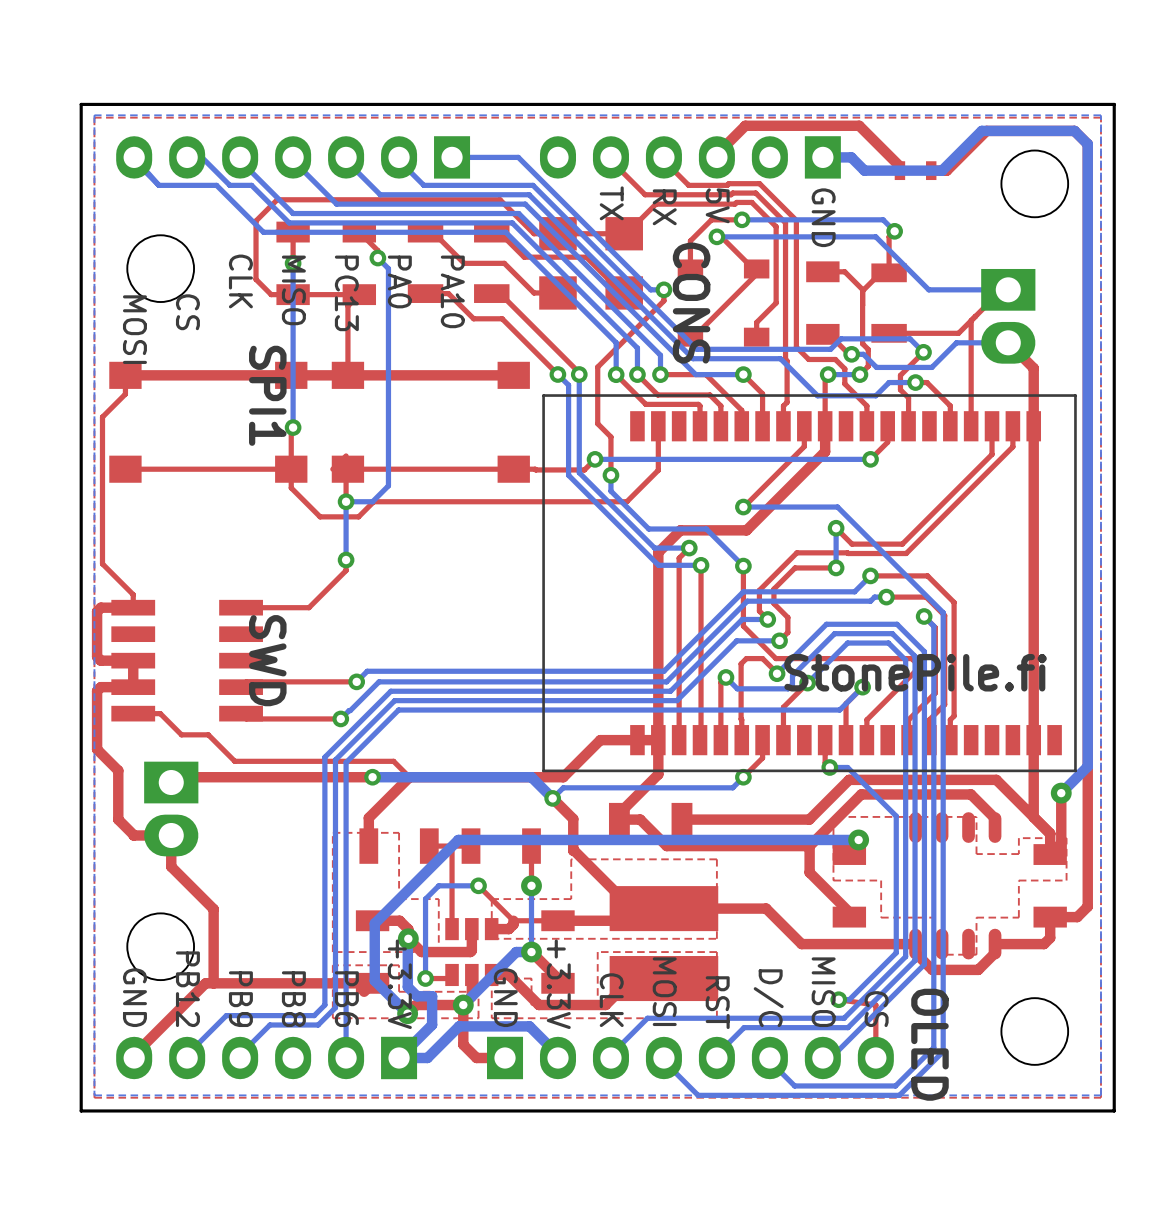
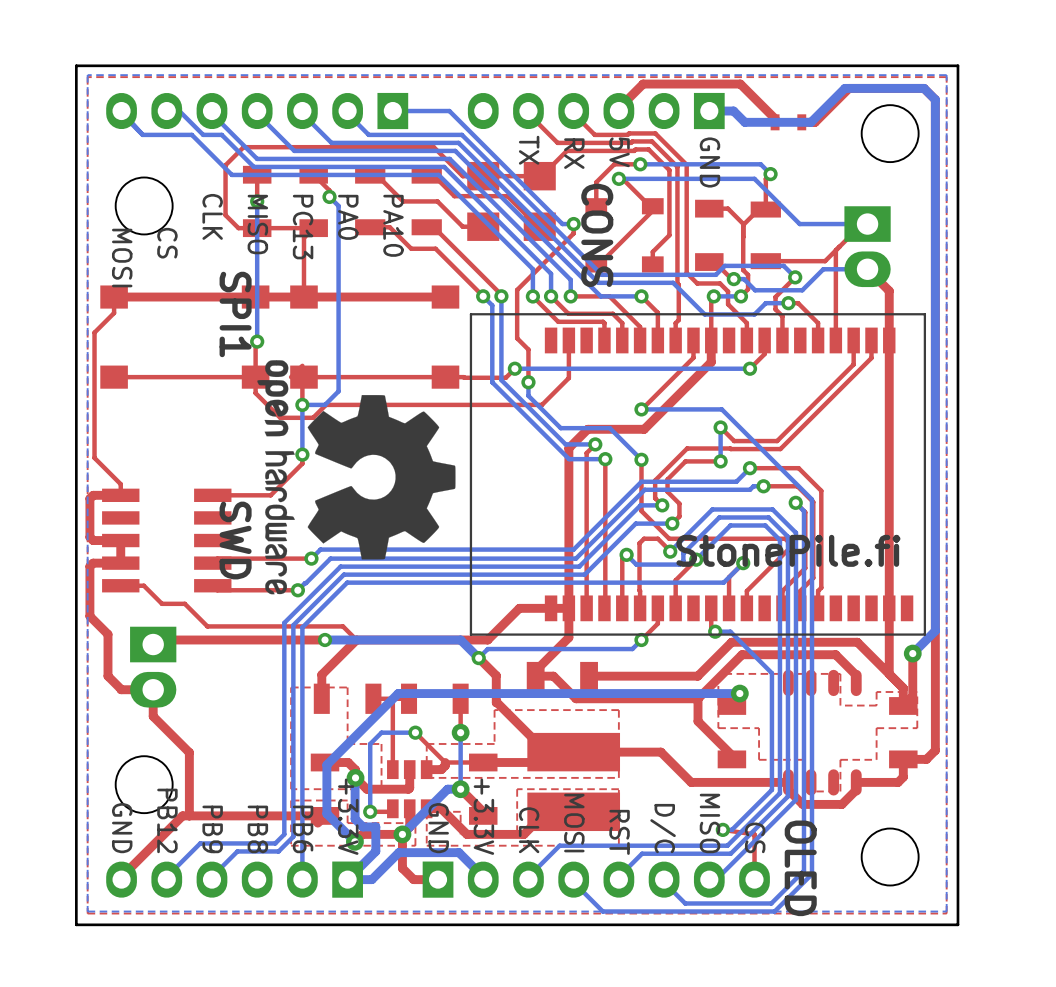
drawing: none -> [257, 360, 456, 595]

